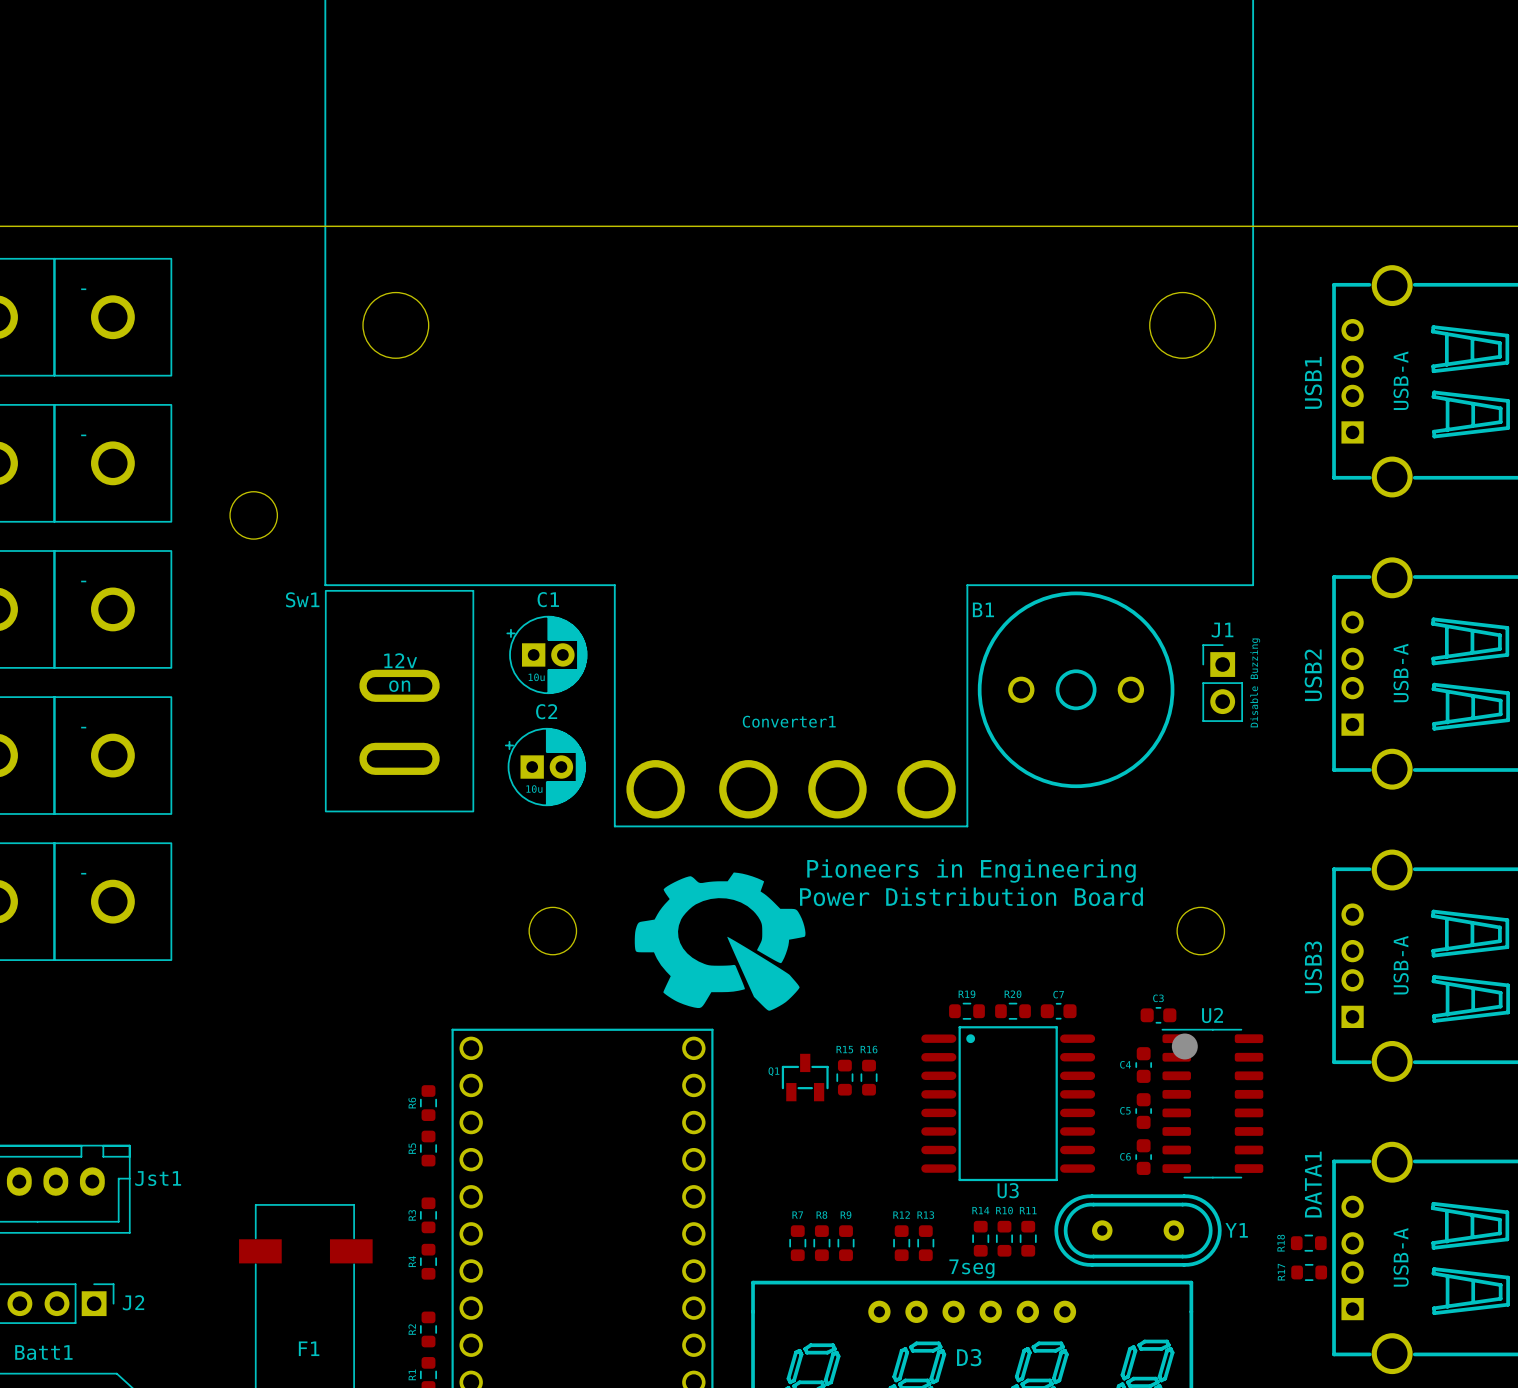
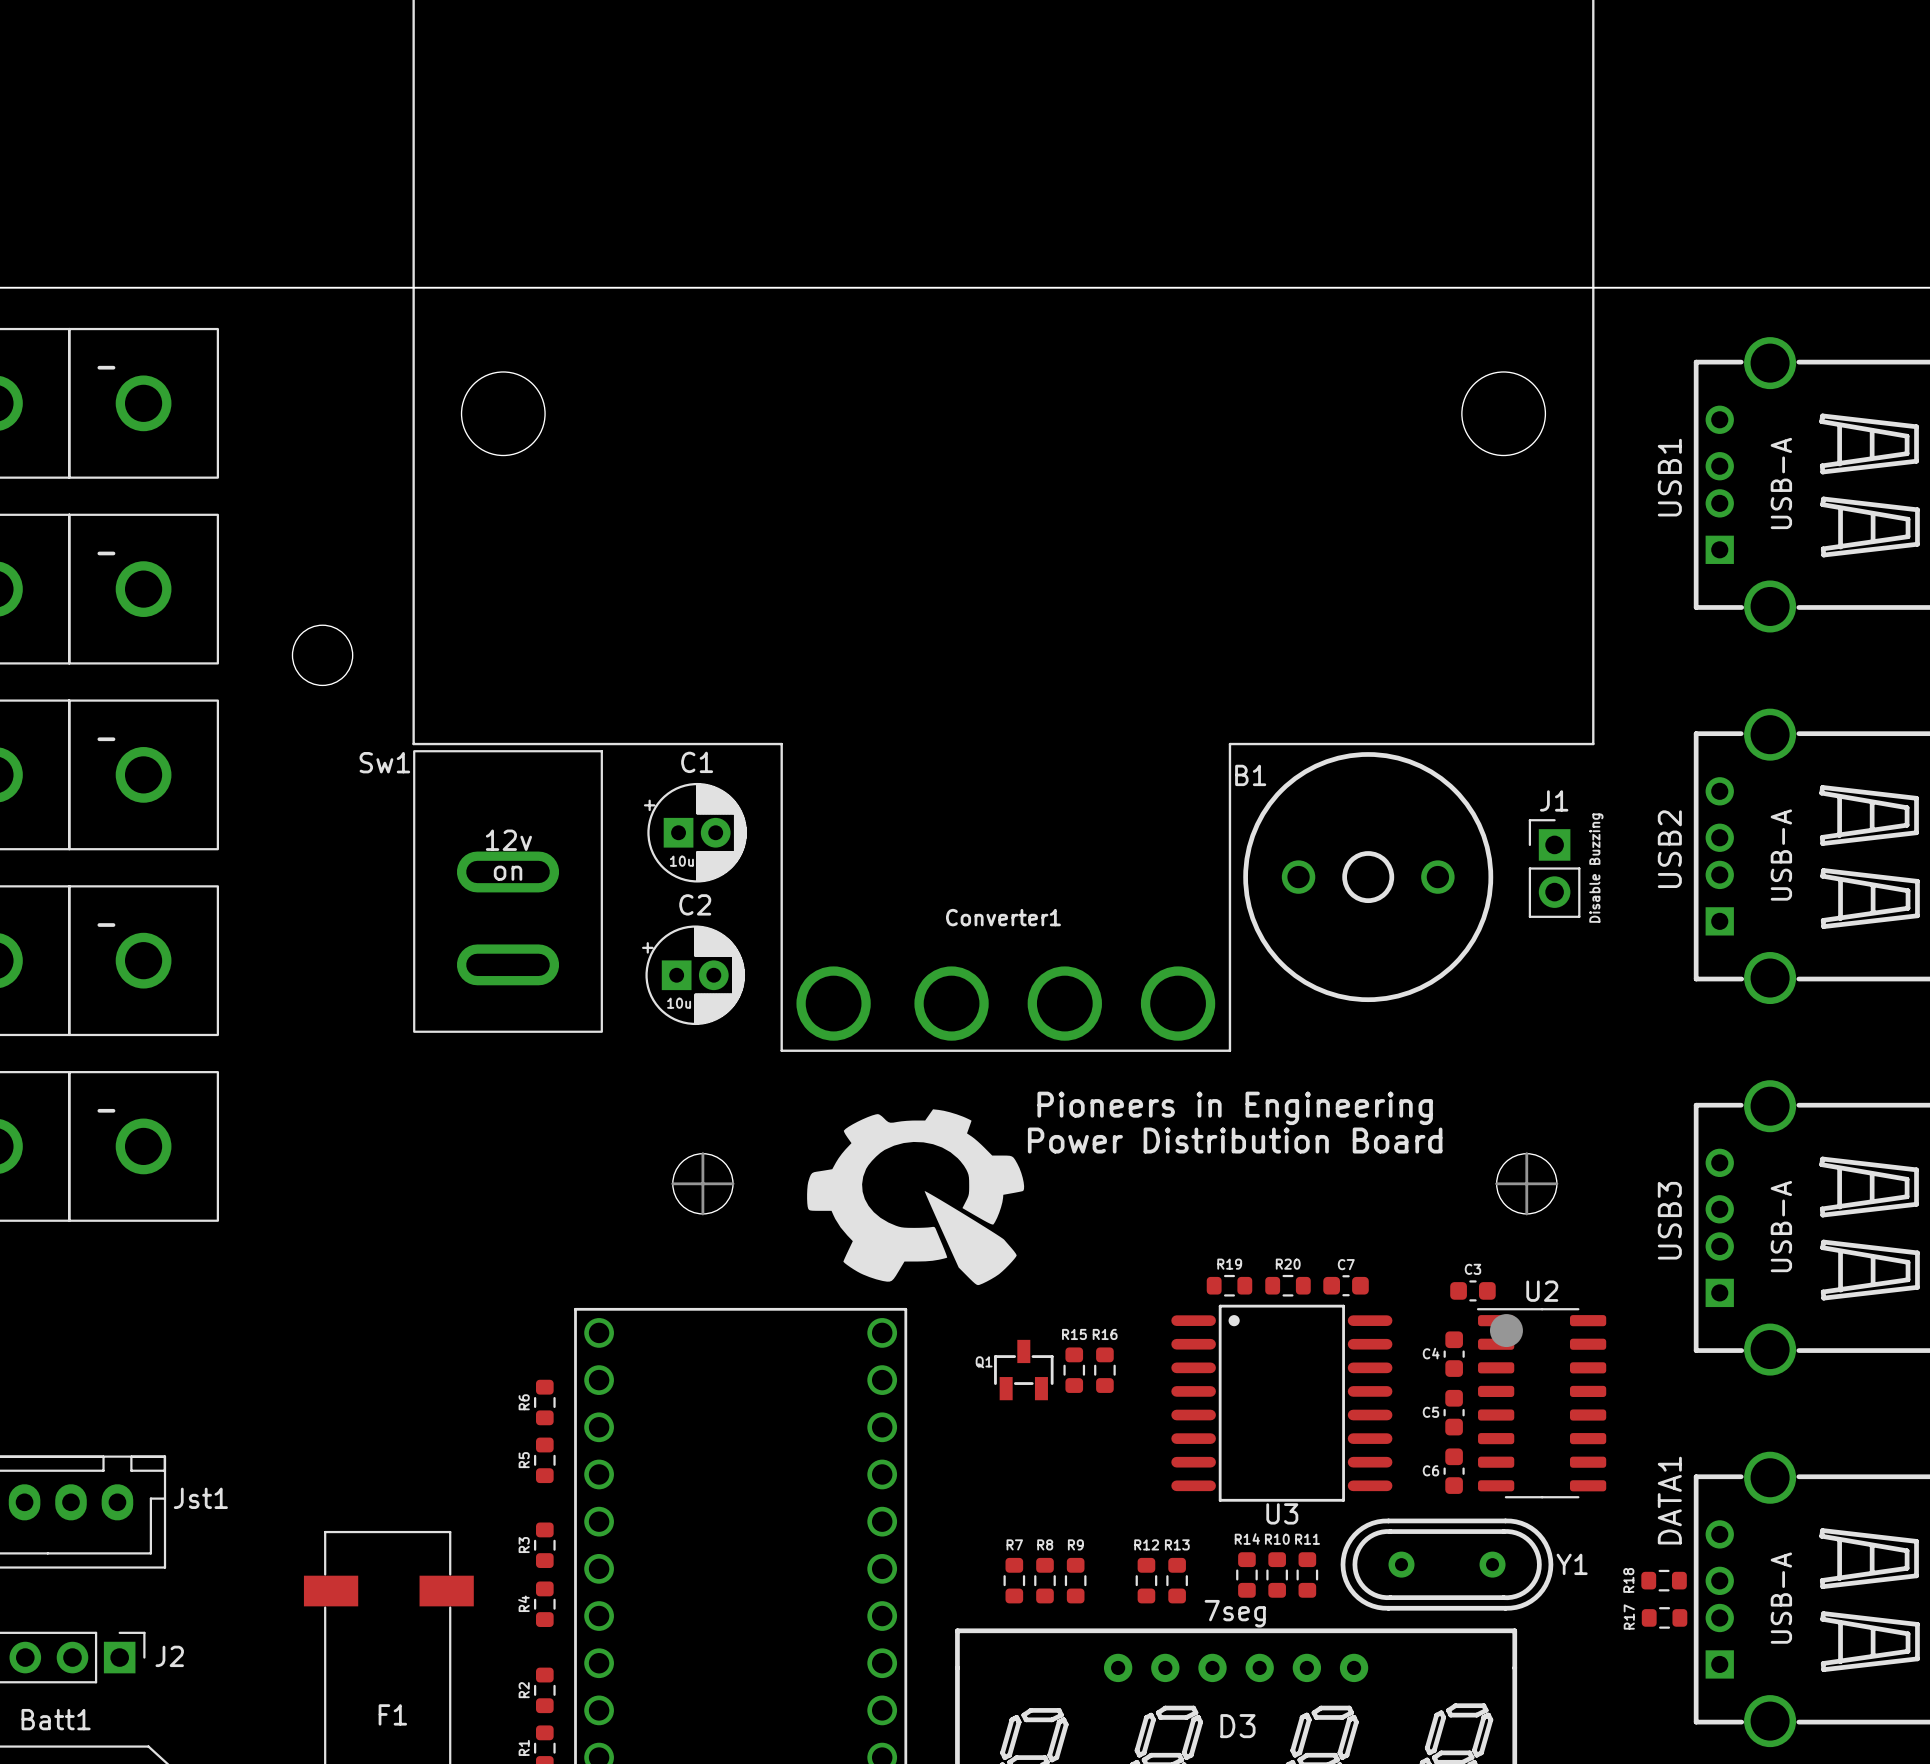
line: none -> (702, 1153) (702, 1214)
line: none -> (1526, 1153) (1526, 1214)
line: none -> (672, 1183) (733, 1183)
line: none -> (1496, 1183) (1556, 1183)

